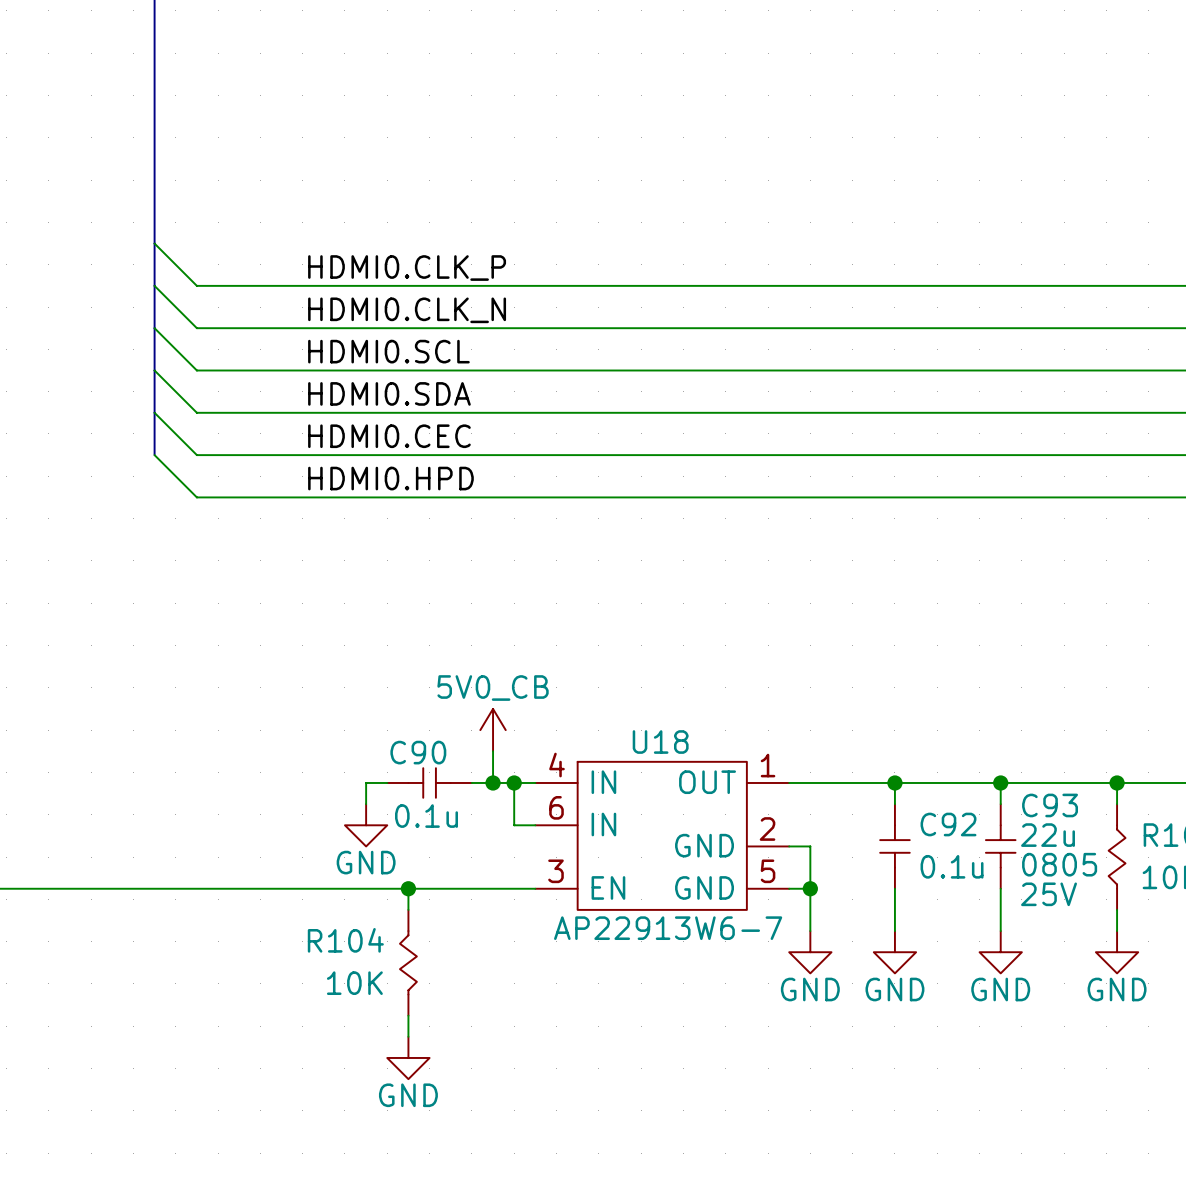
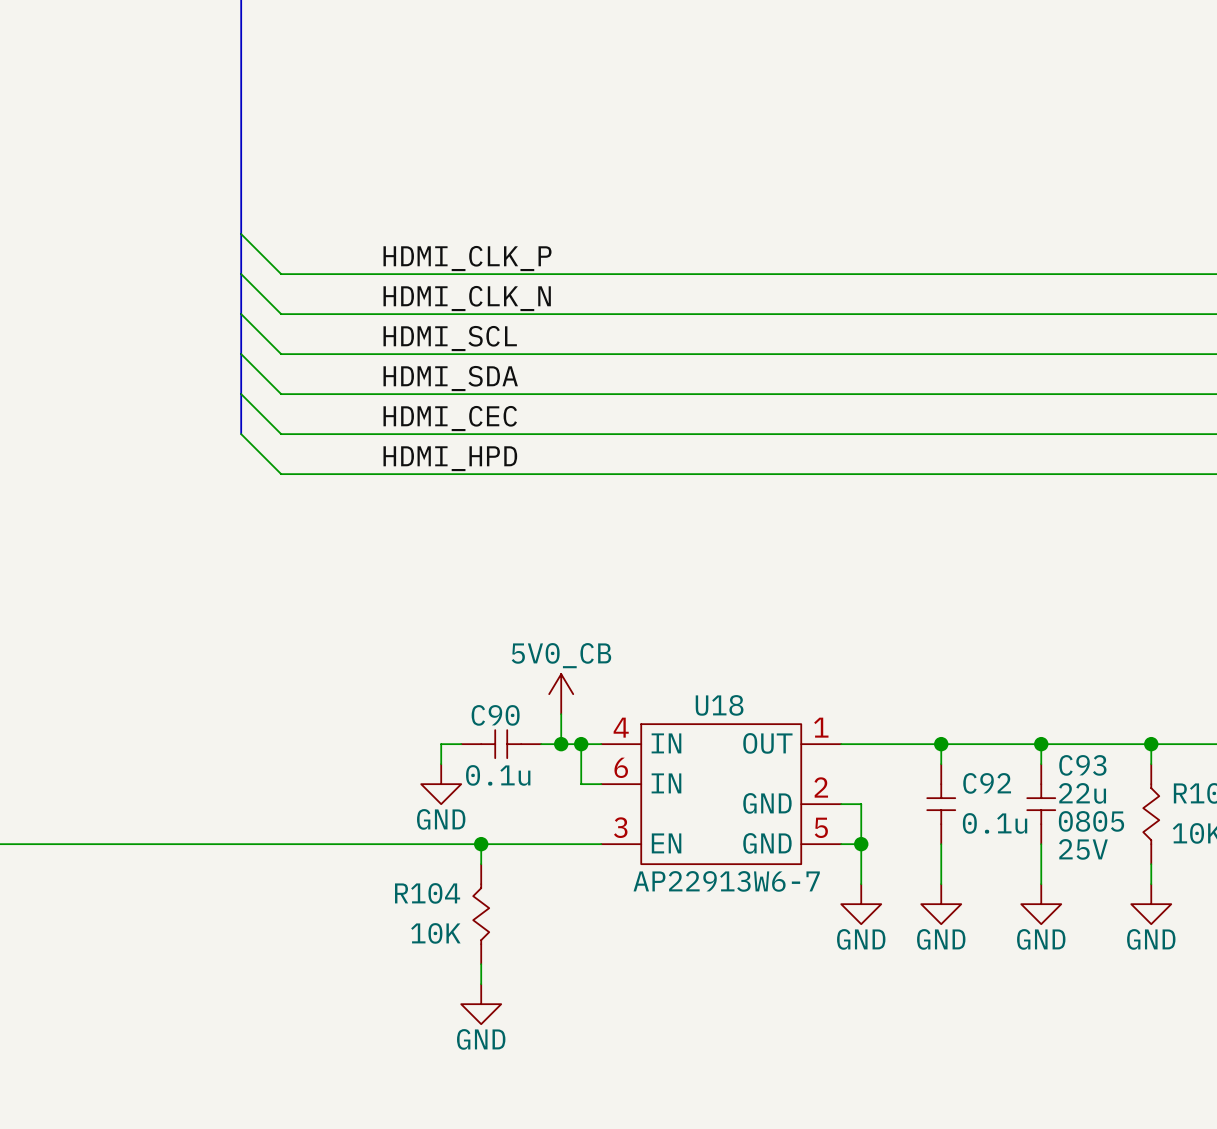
label: HDMI0.CLK_P (407, 268) -> HDMI_CLK_P (467, 258)
label: HDMI0.CLK_N (407, 310) -> HDMI_CLK_N (467, 298)
label: HDMI0.SCL (388, 351) -> HDMI_SCL (450, 338)
label: HDMI0.SDA (389, 393) -> HDMI_SDA (450, 378)
label: HDMI0.CEC (389, 436) -> HDMI_CEC (450, 418)
label: HDMI0.HPD (390, 478) -> HDMI_HPD (450, 458)

